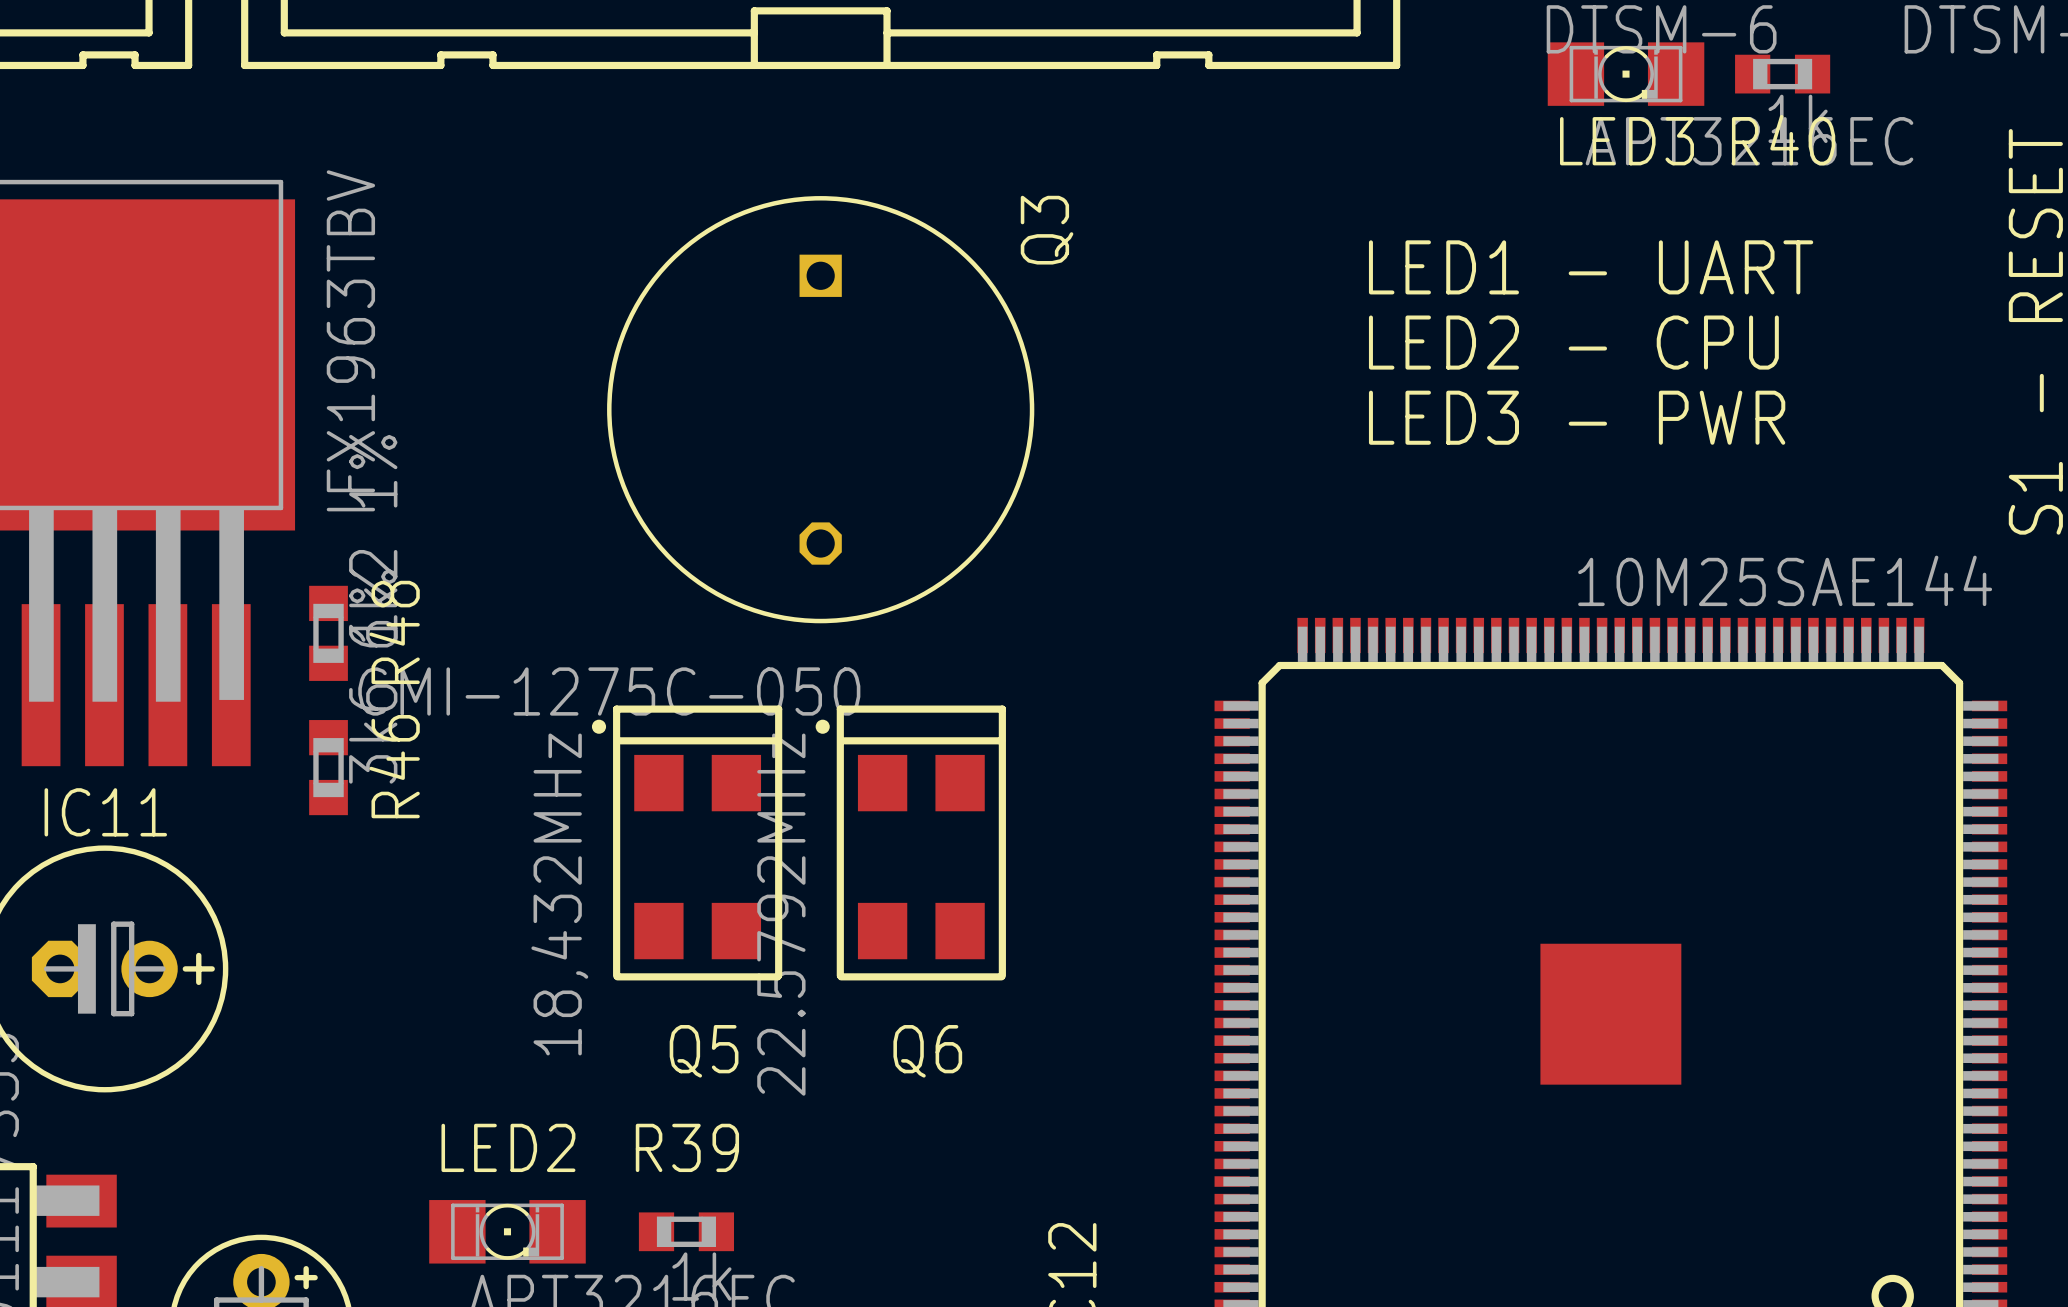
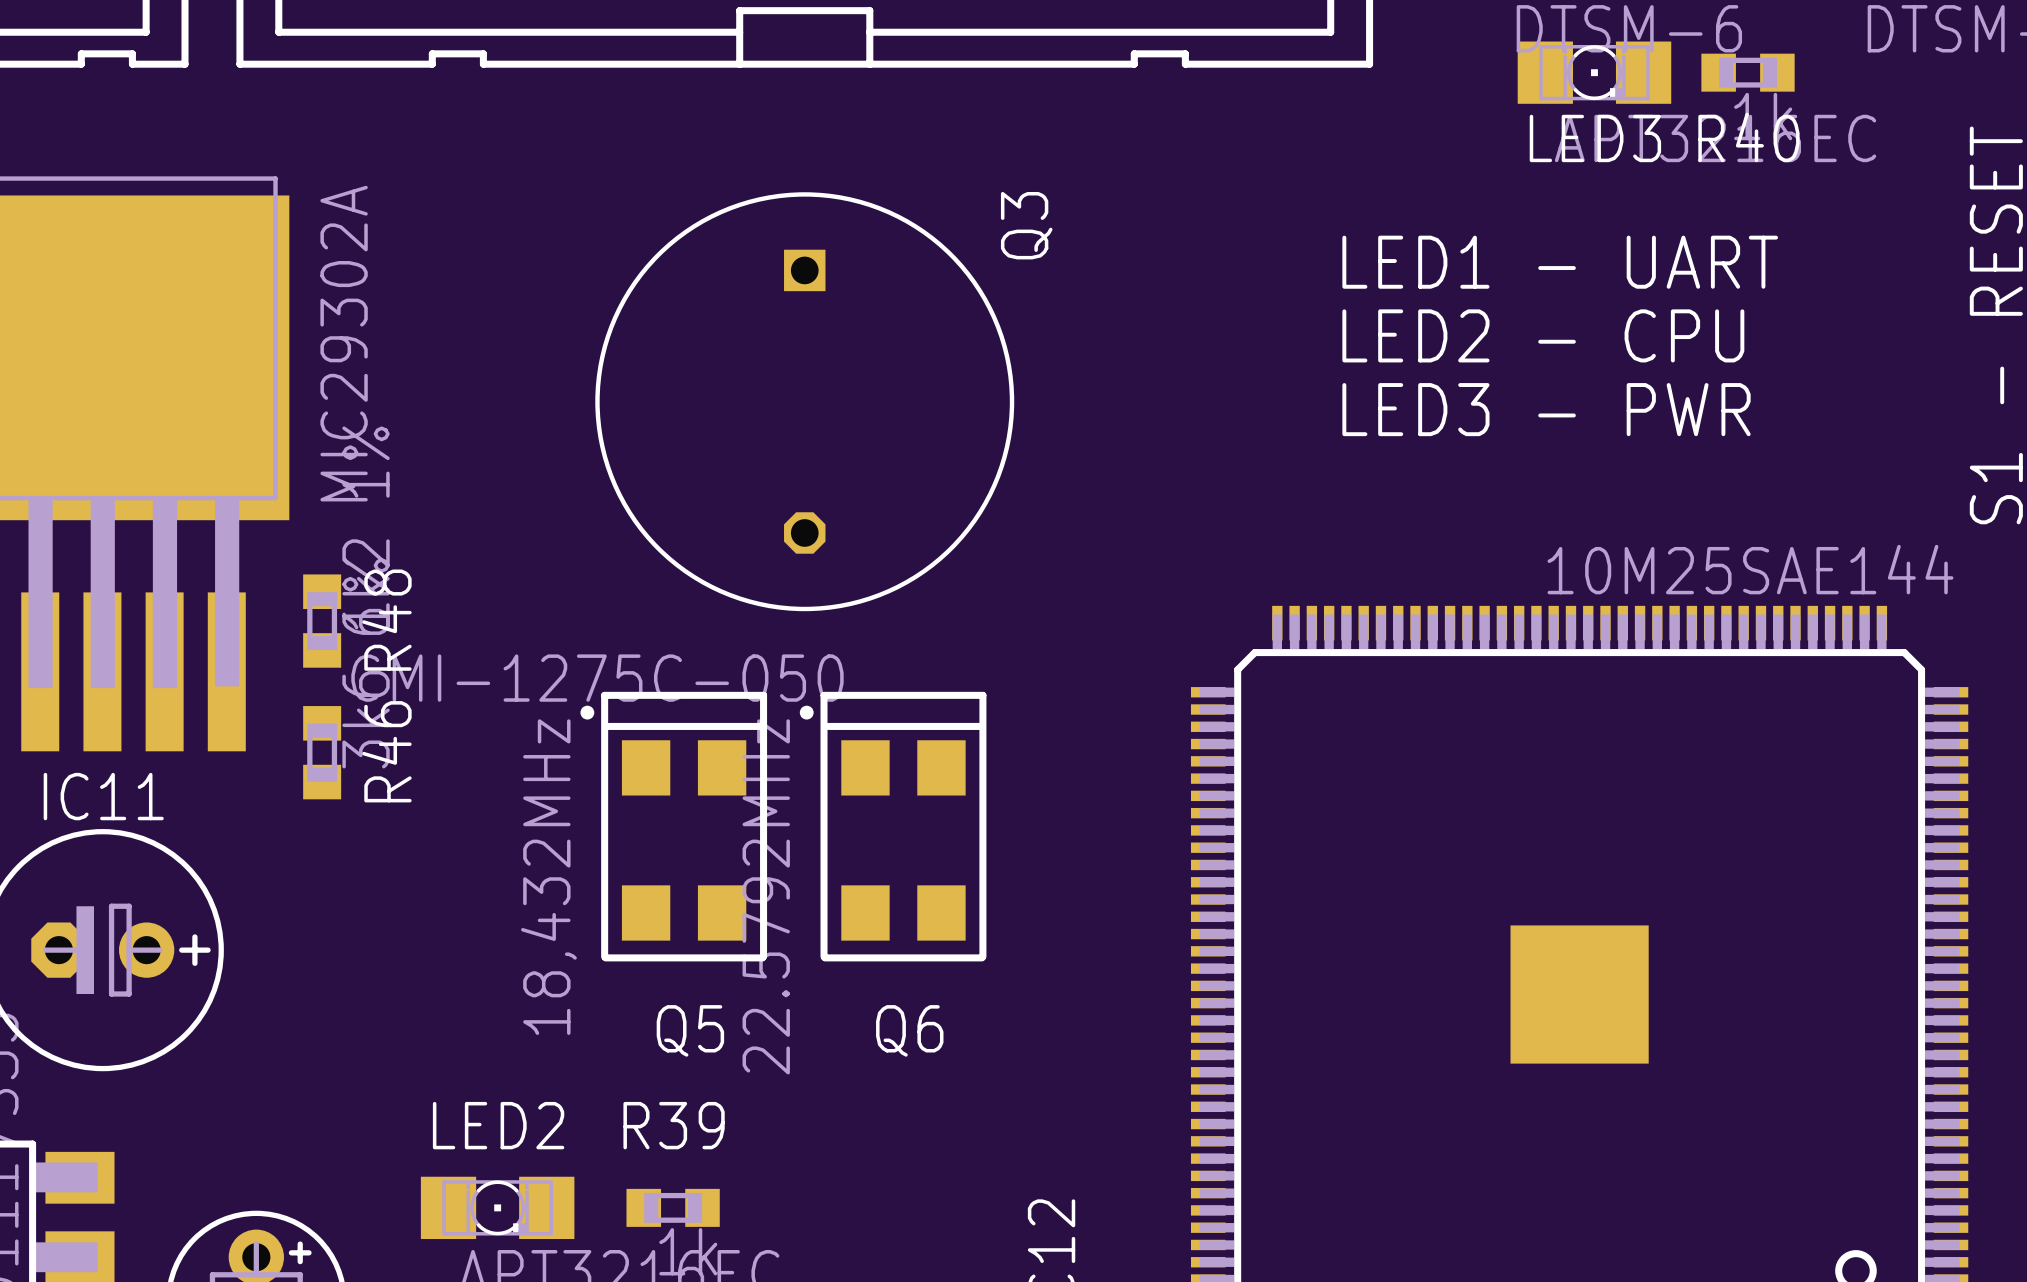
IC11 value: IFX1963TBV (350, 340) -> MIC29302A (344, 343)

